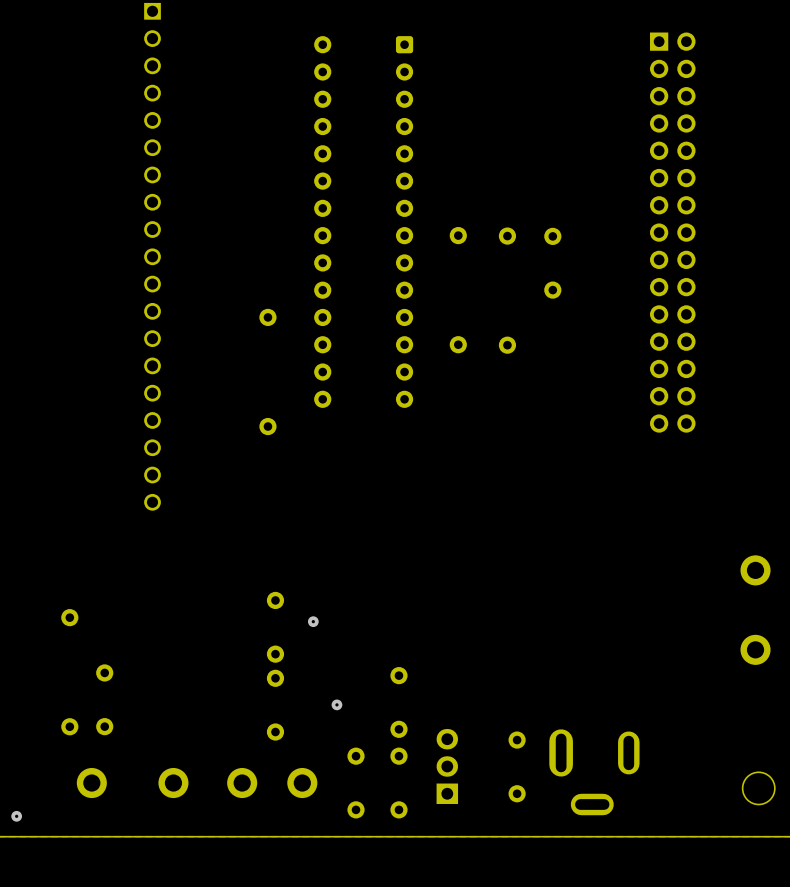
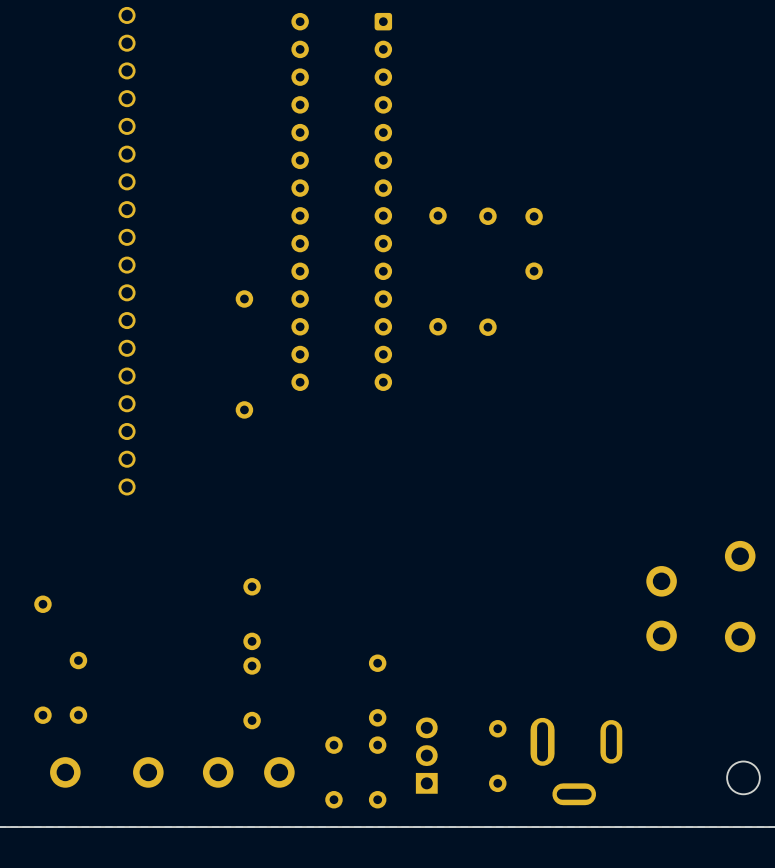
part: (672, 232) -> none
part: none -> (661, 581)
via: (313, 621) -> none
part: none -> (661, 635)
via: (336, 704) -> none

